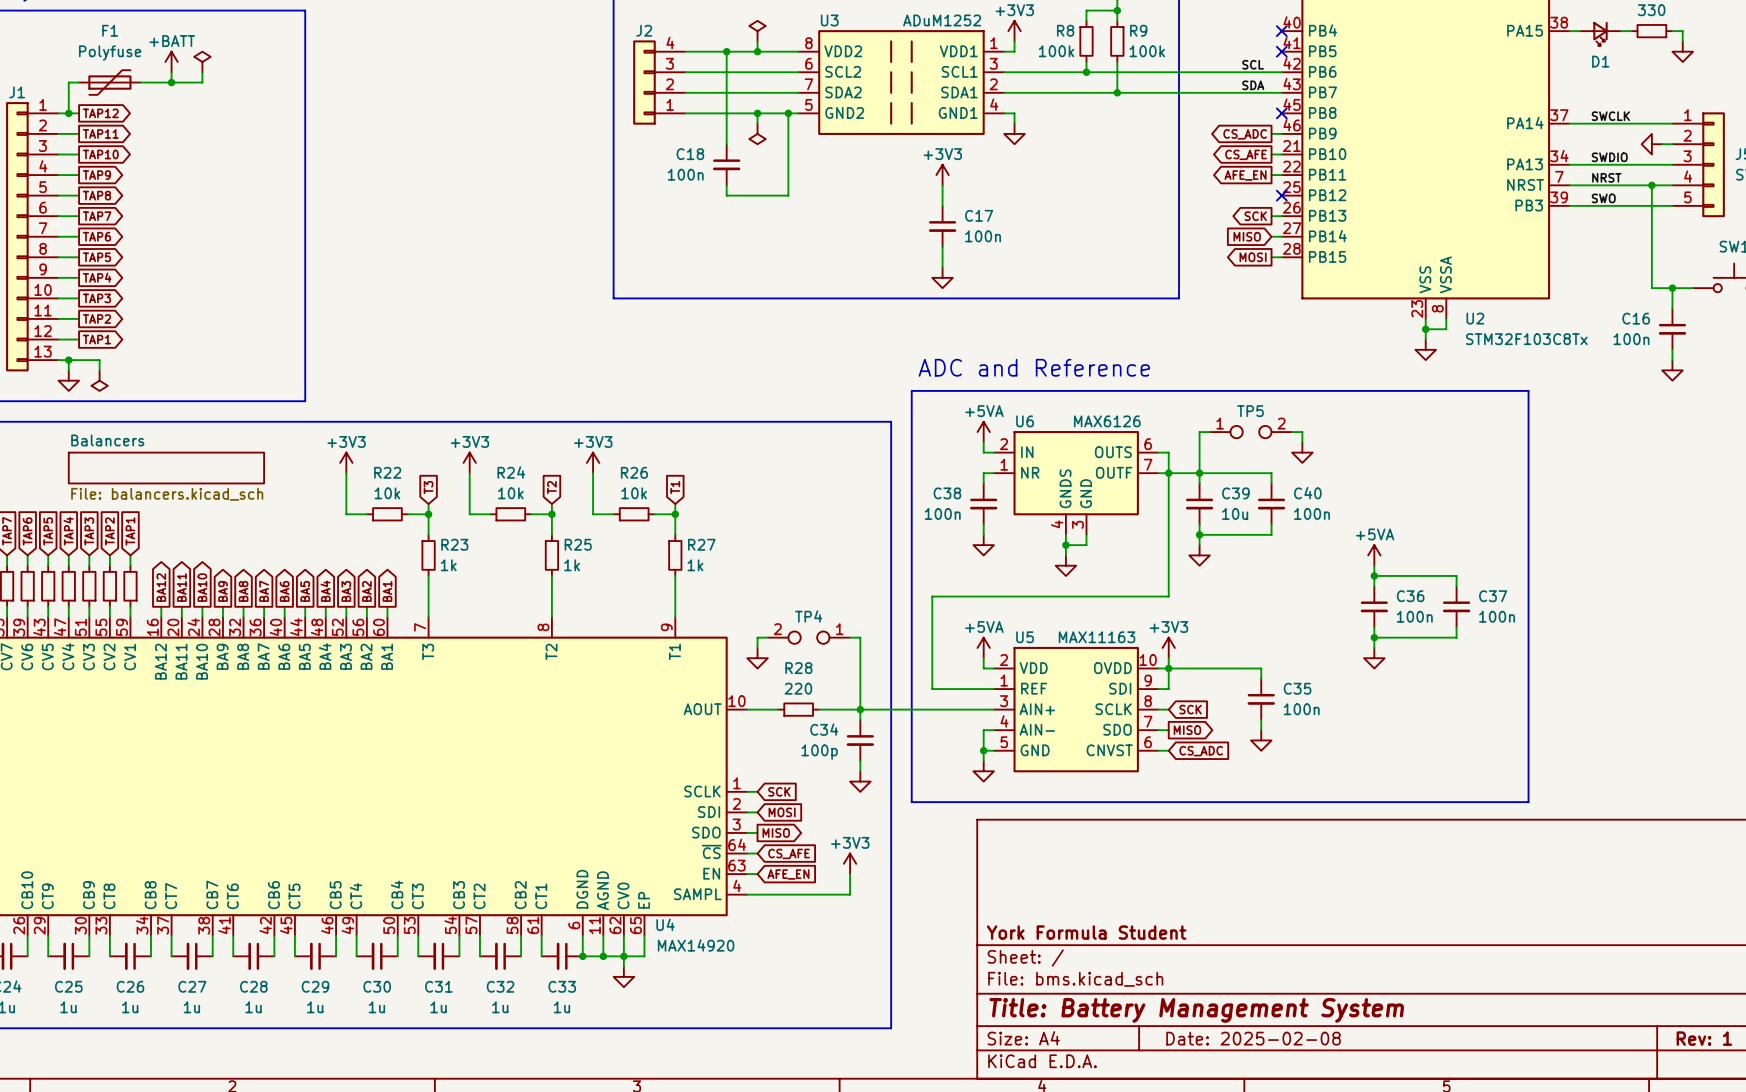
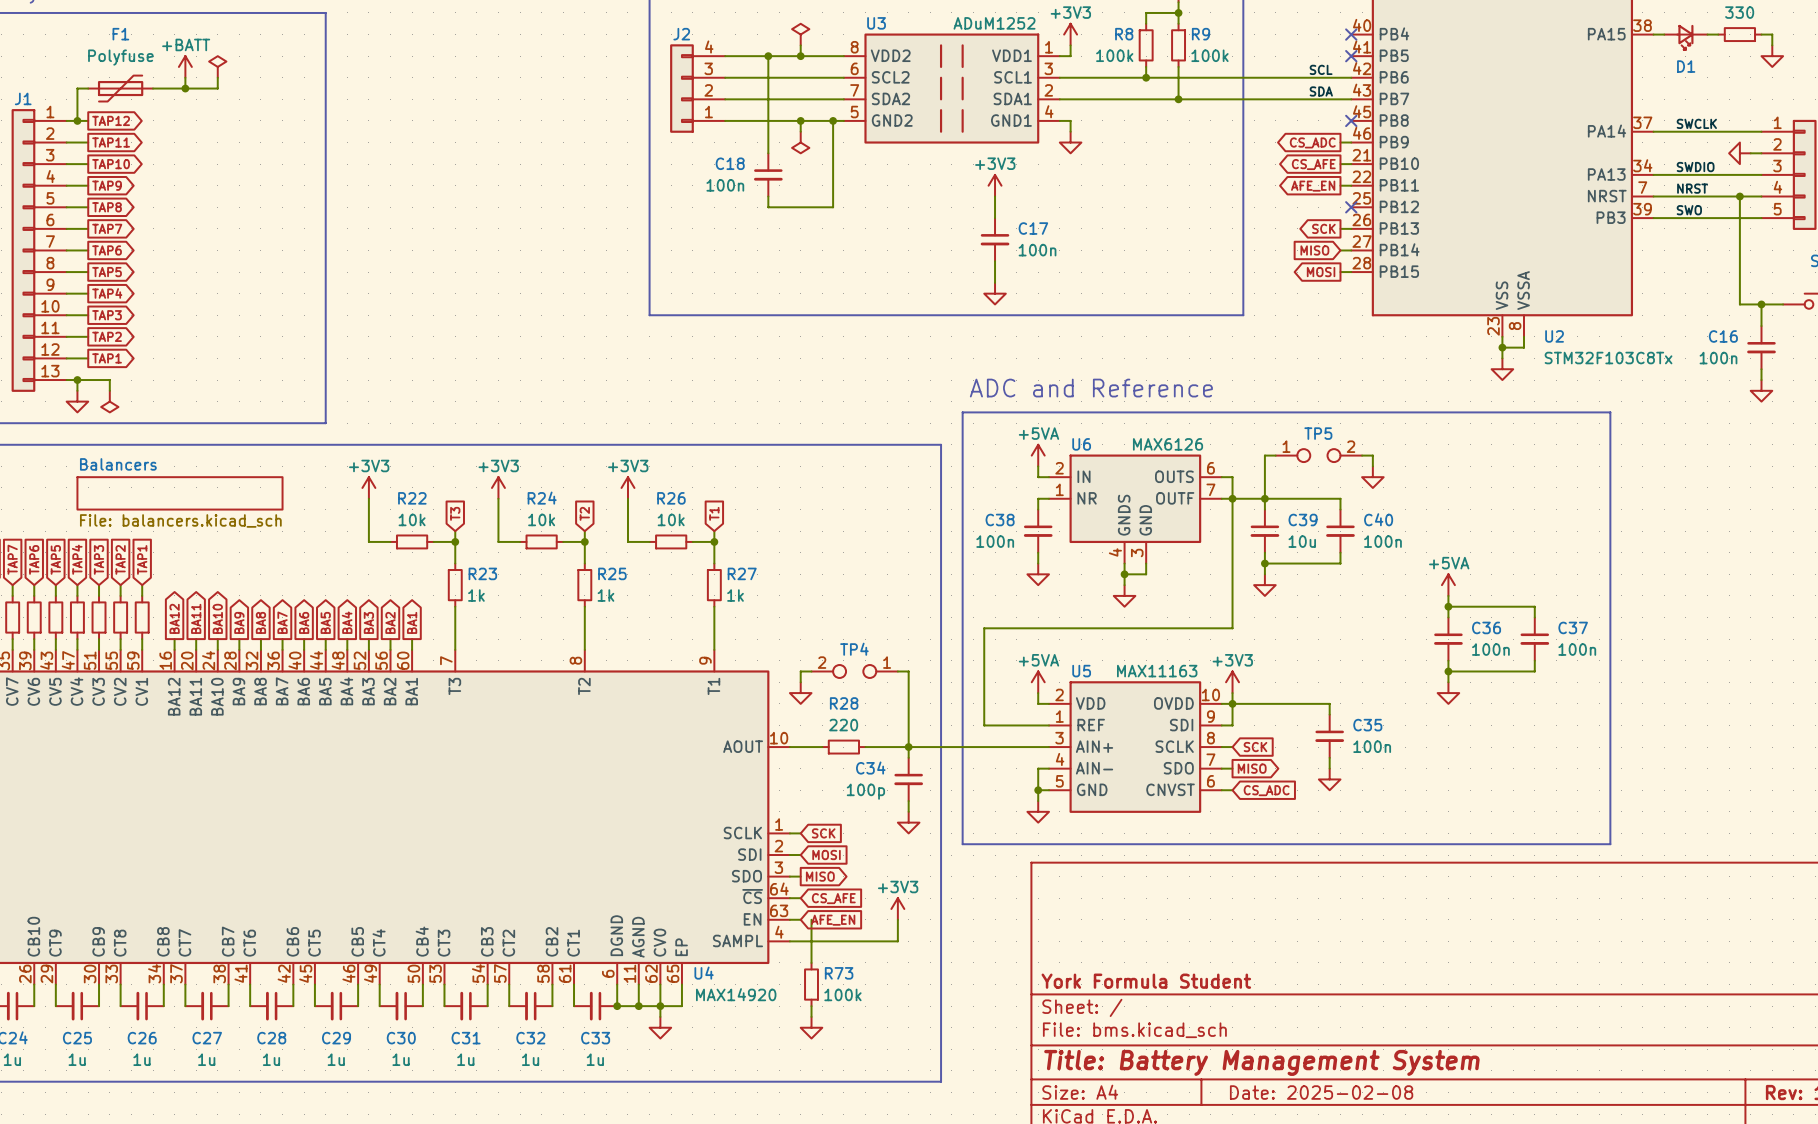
wire: none -> (811, 919) (811, 962)
R73: none -> 100k (811, 984)
wire: none -> (811, 1006) (811, 1016)
power symbol: none -> (811, 1027)

